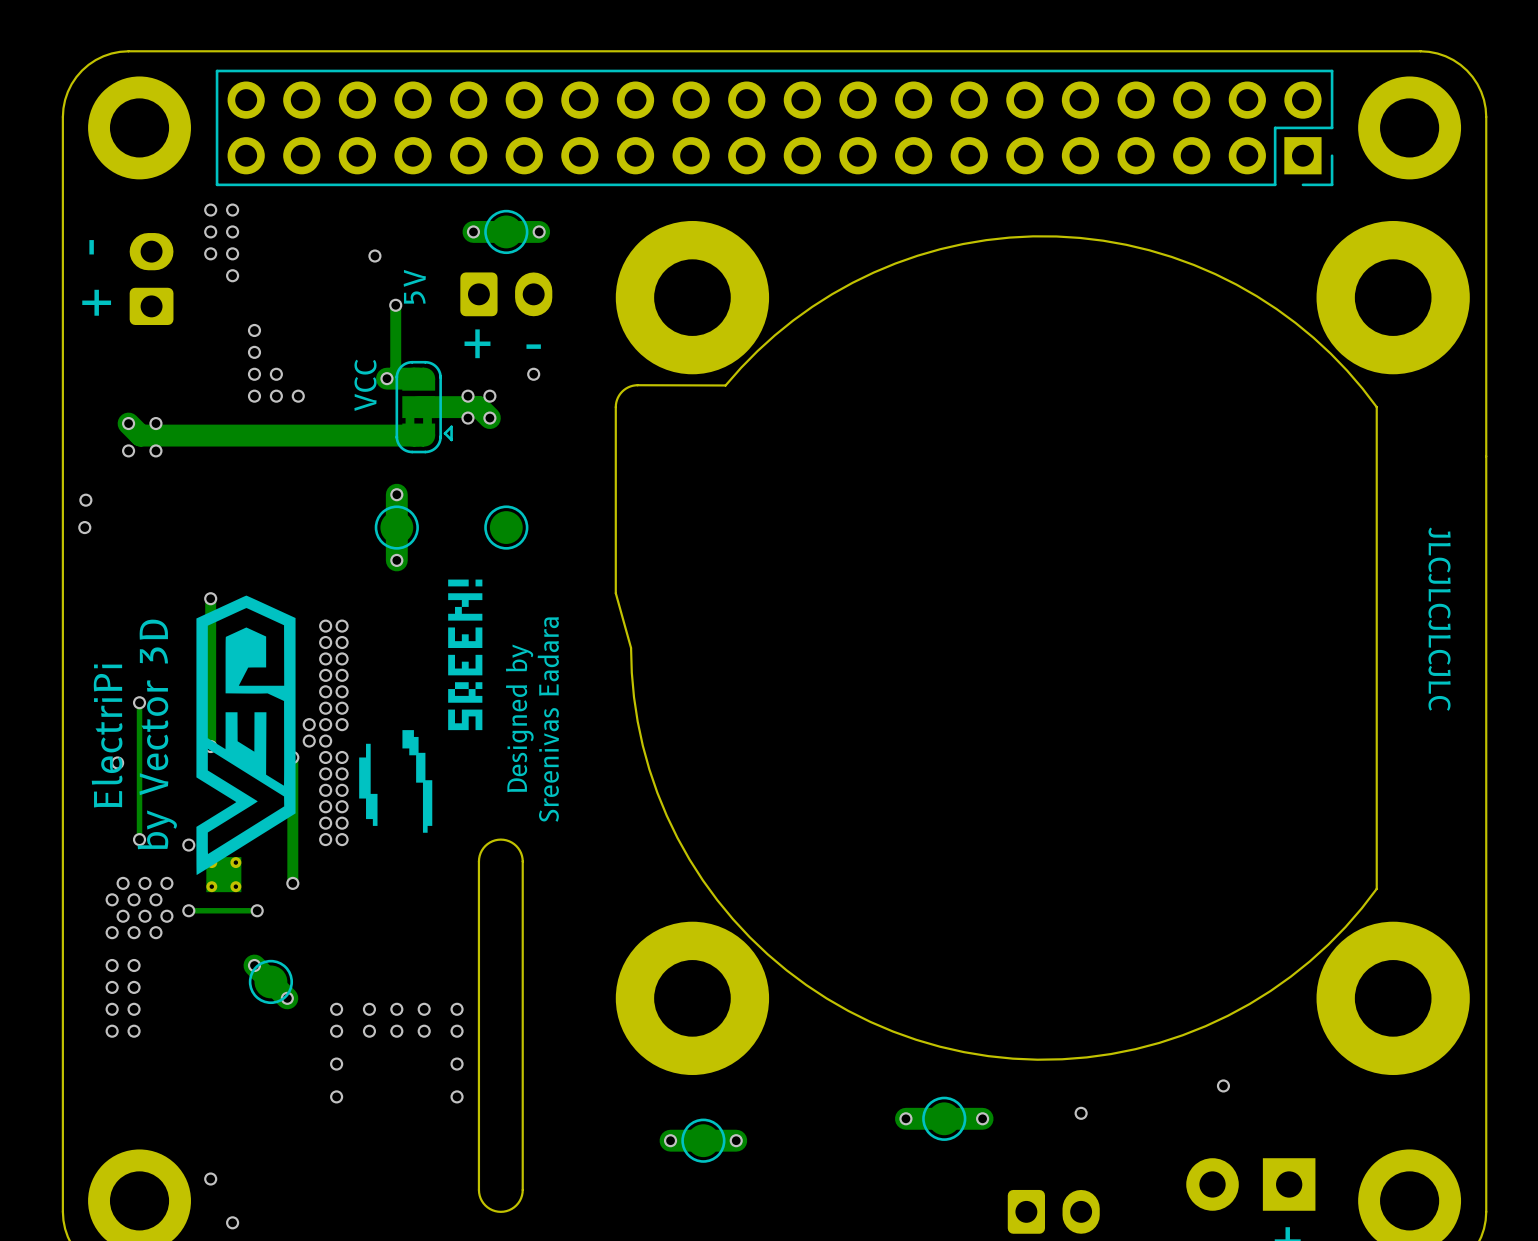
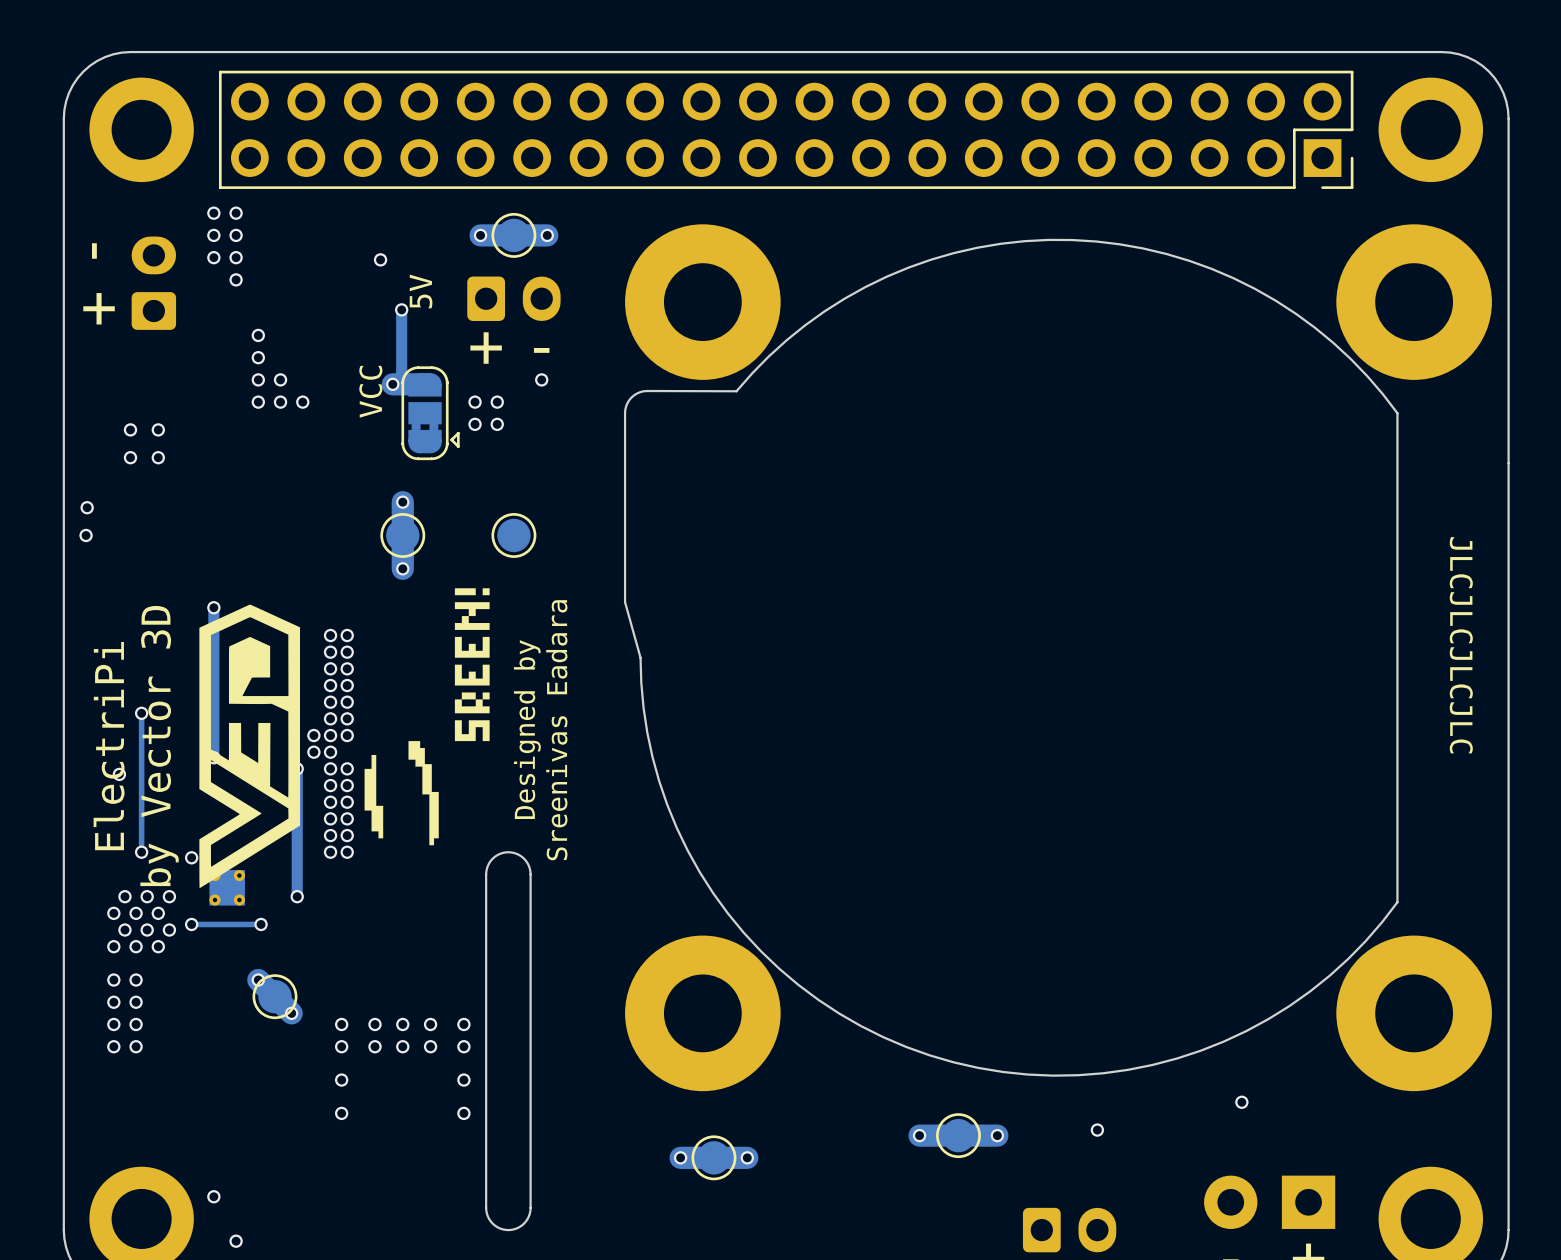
track: (418, 407) (478, 407) (489, 418) -> none
track: (128, 423) (140, 435) (418, 435) -> none

